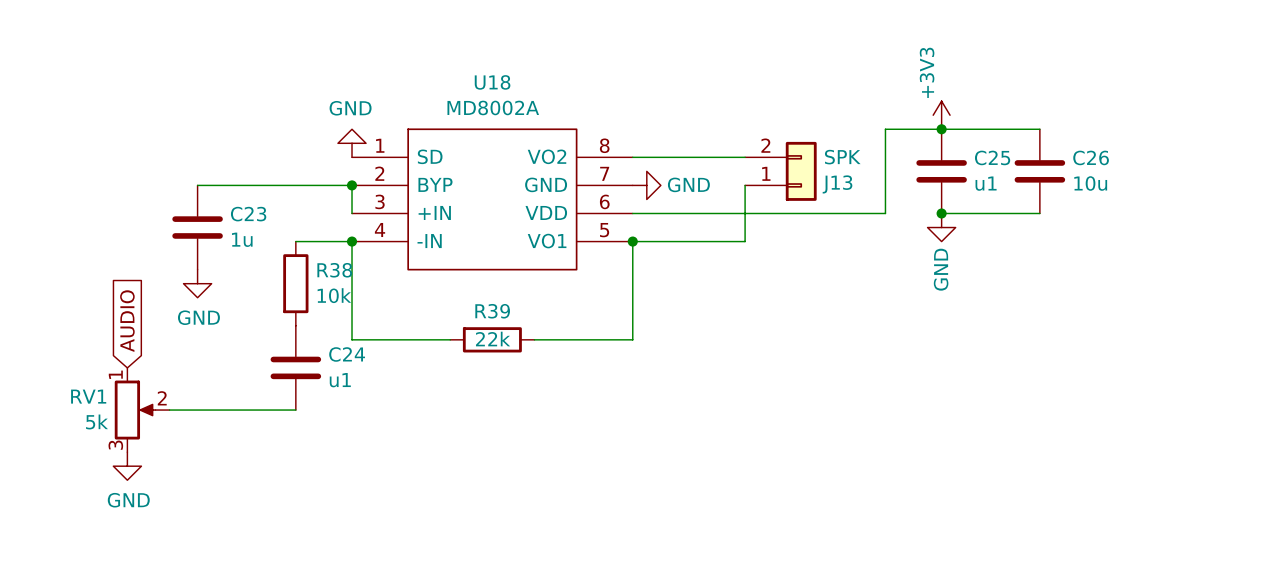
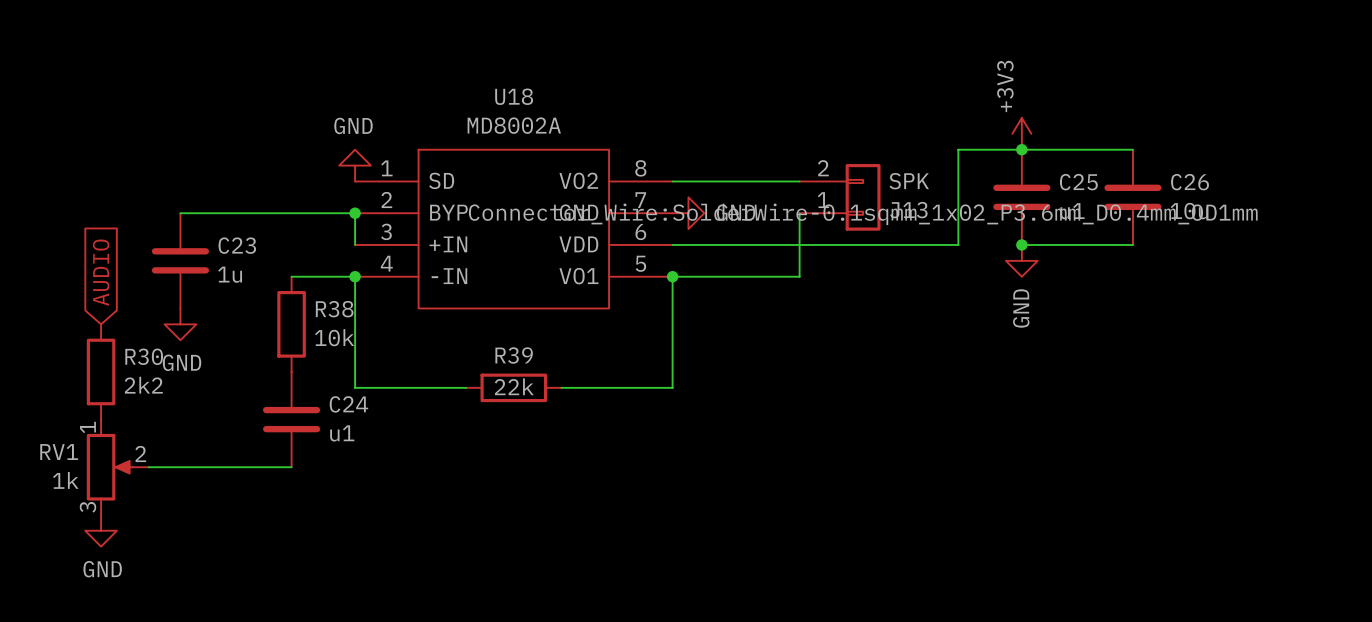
J13 text: none -> Connector_Wire:SolderWire-0.1sqmm_1x02_P3.6mm_D0.4mm_OD1mm (863, 214)
global label position: AUDIO (127, 321) -> AUDIO (101, 272)
R30: none -> 2k2 (101, 371)
RV1 value: 5k (97, 421) -> 1k (65, 480)

